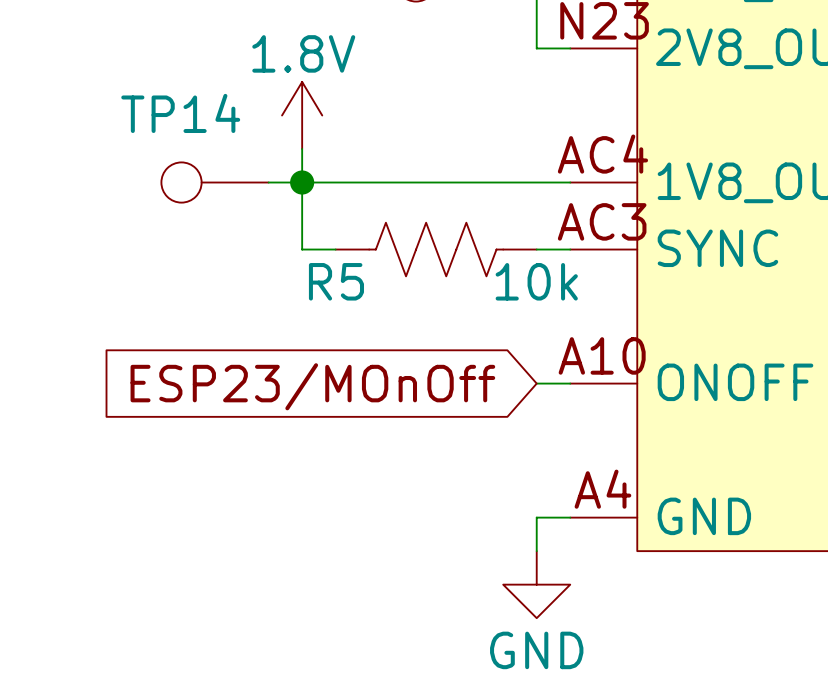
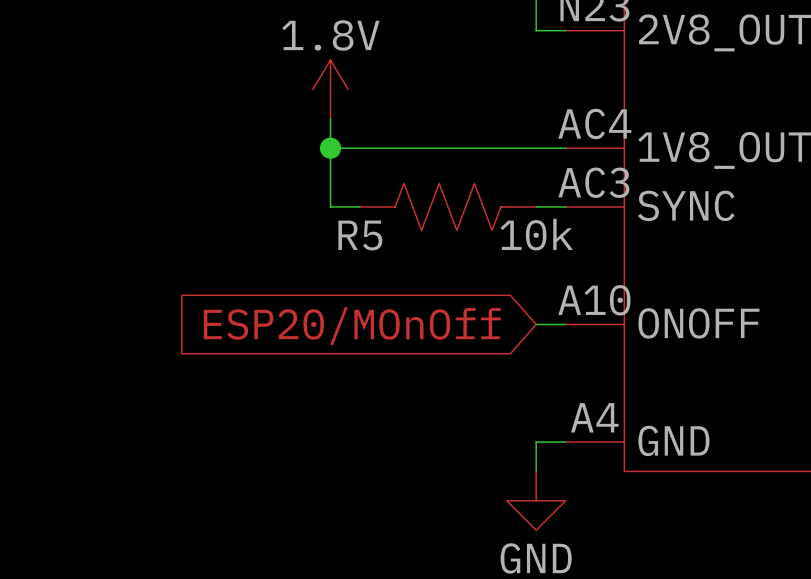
TP14: (215, 182) -> none
wire: (268, 182) (302, 182) -> none
global label: ESP23/MOnOff (312, 386) -> ESP20/MOnOff (352, 326)

